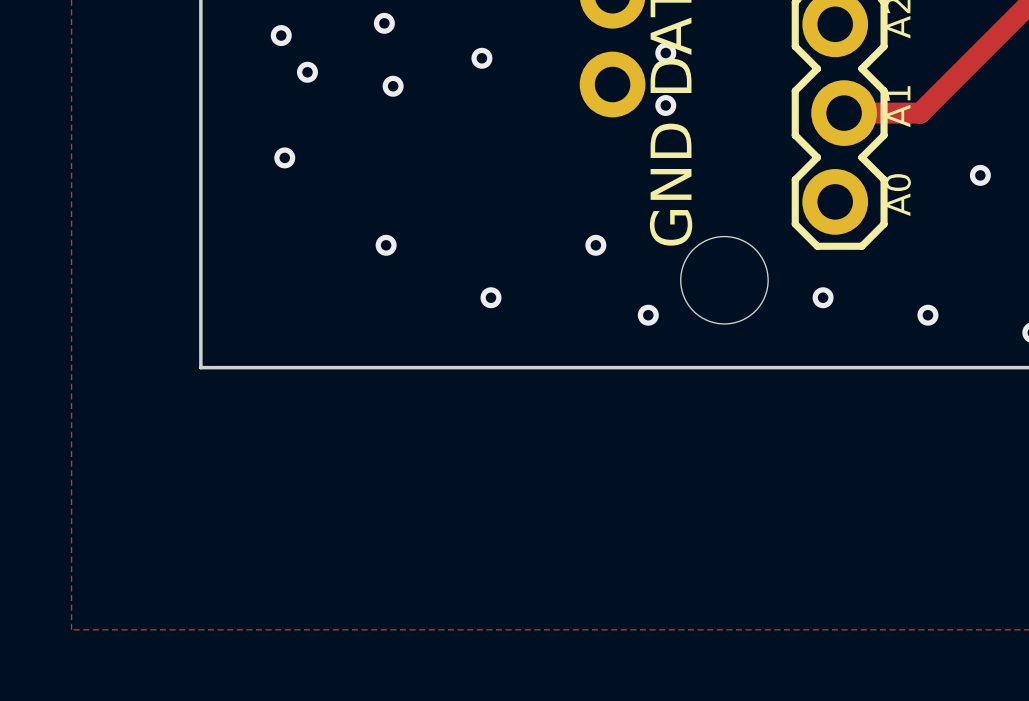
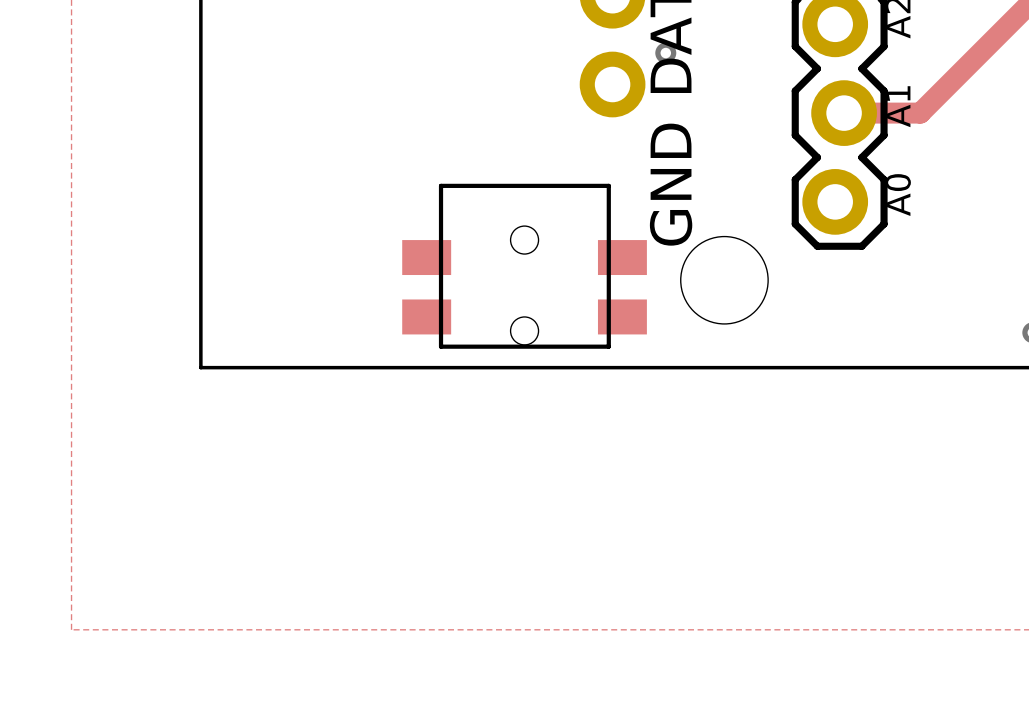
via: (384, 23) -> none
via: (281, 35) -> none
via: (481, 58) -> none
via: (307, 72) -> none
via: (393, 86) -> none
via: (665, 105) -> none
via: (284, 157) -> none
via: (980, 175) -> none
via: (386, 245) -> none
via: (595, 245) -> none
part: none -> (524, 266)
via: (491, 297) -> none
via: (823, 297) -> none
via: (648, 315) -> none
via: (927, 315) -> none

